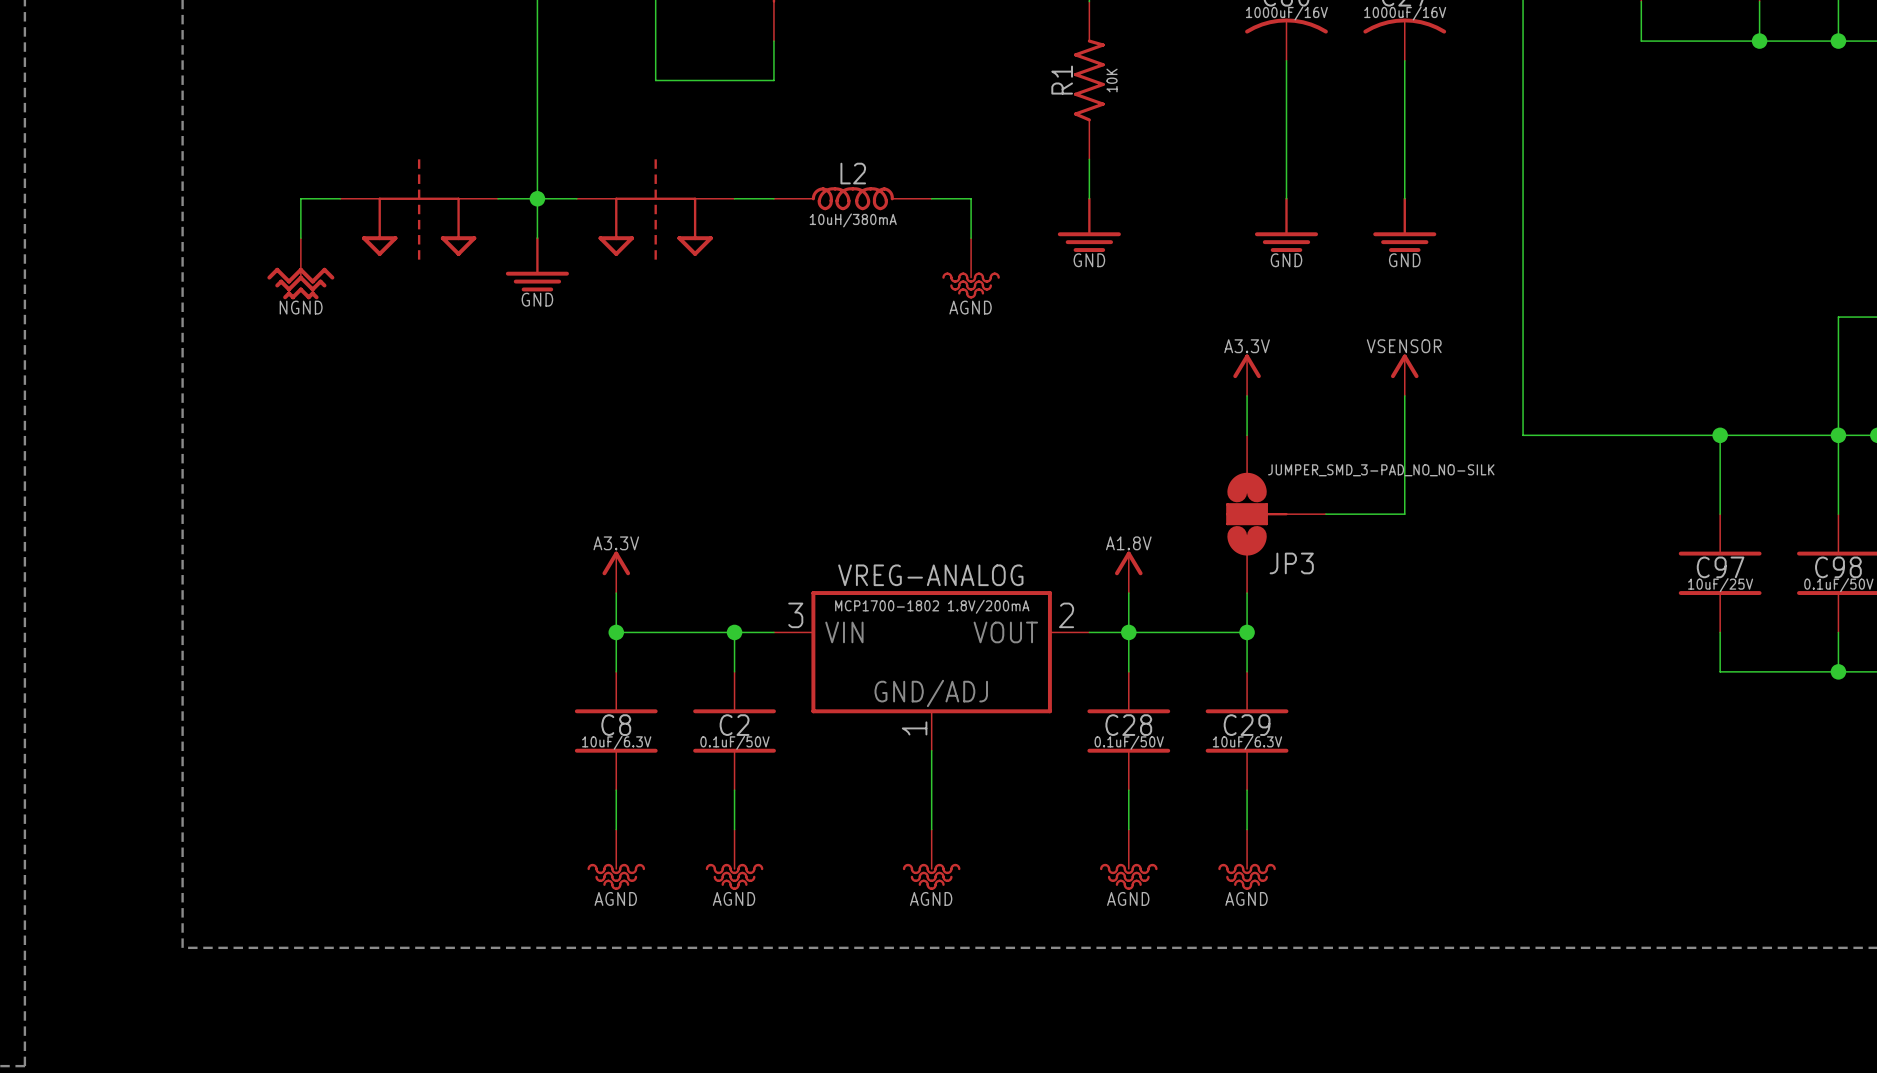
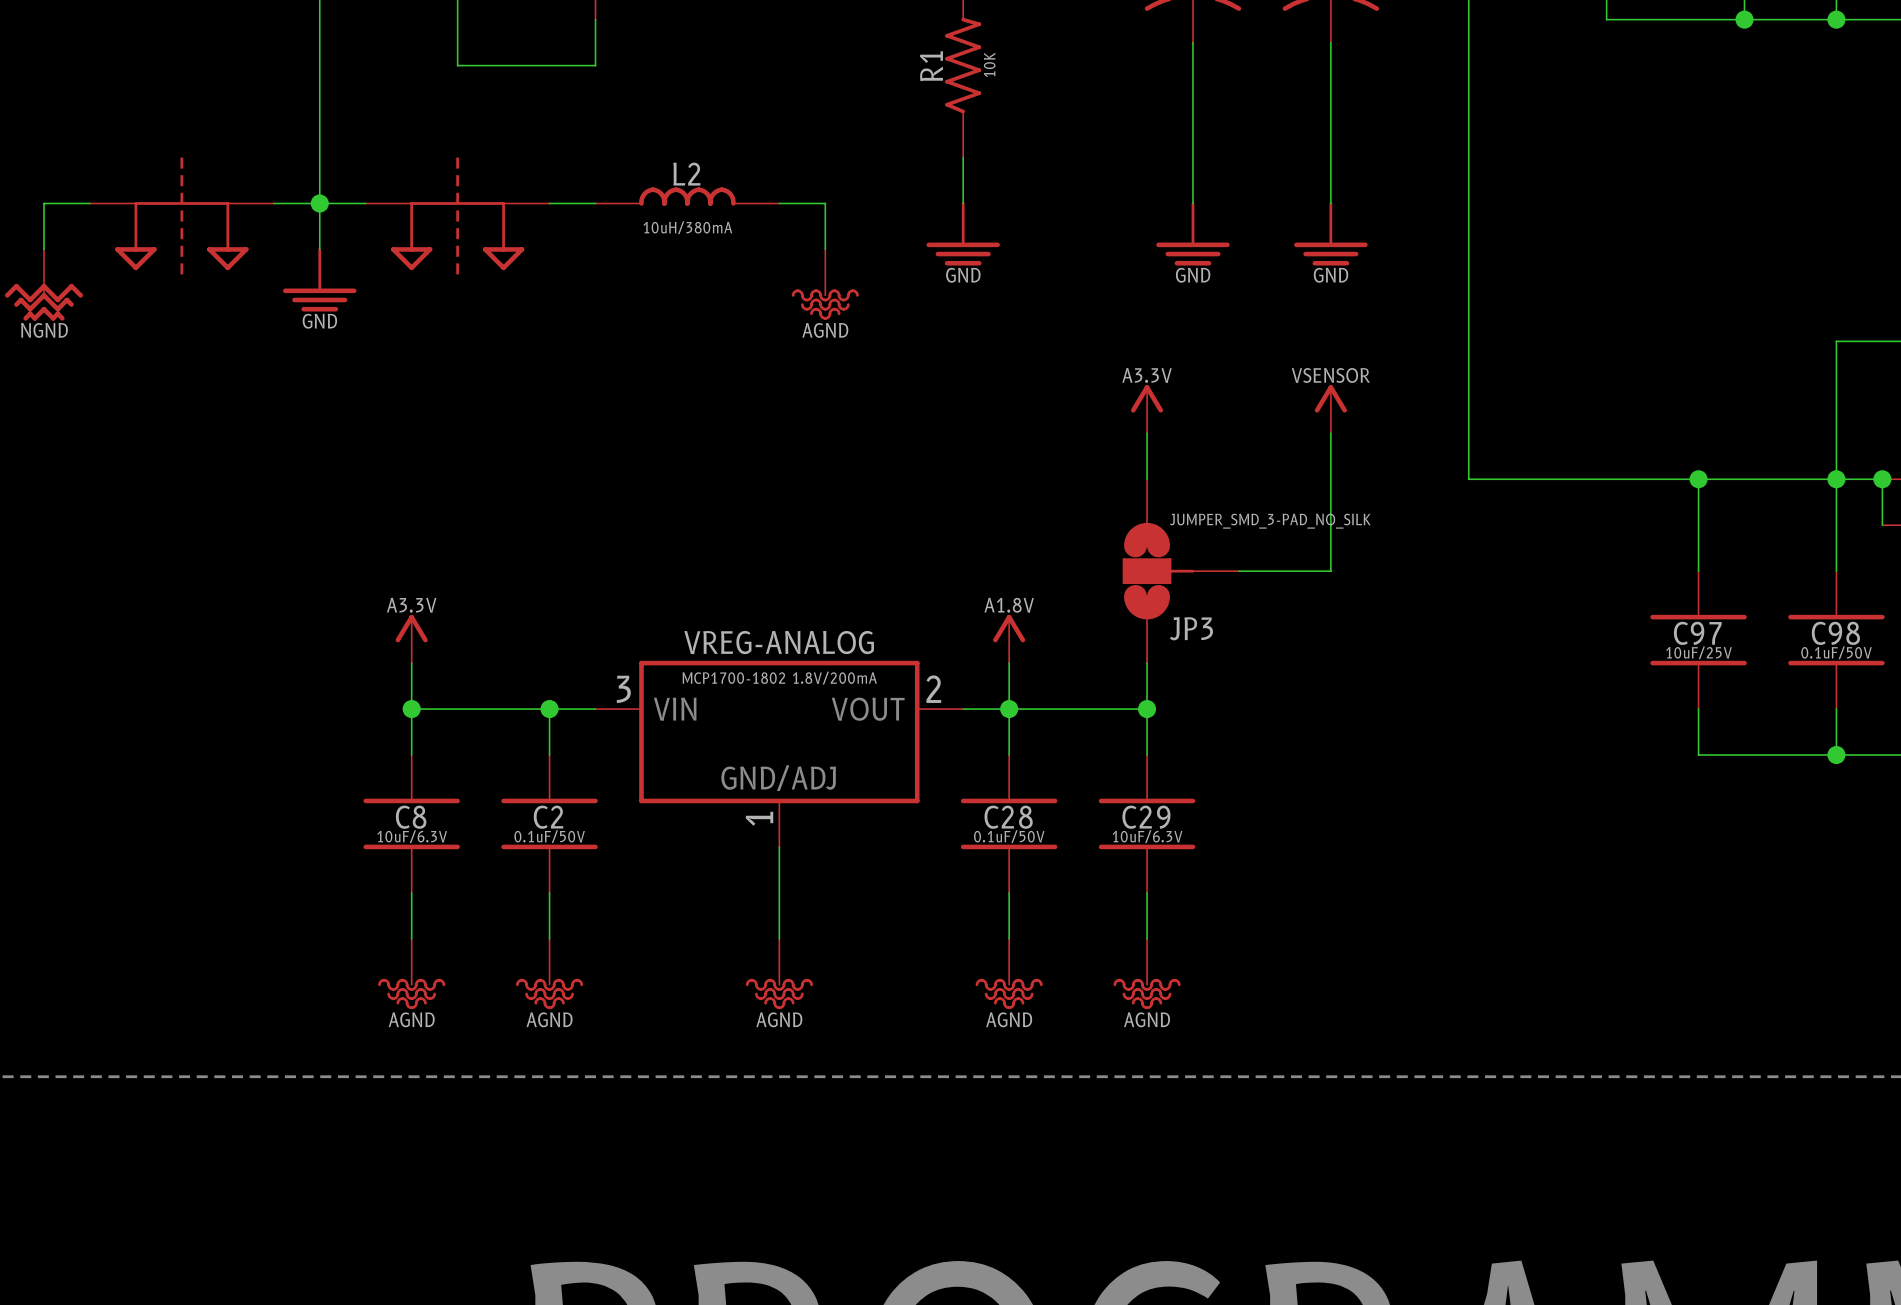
L2 symbol: [773, 187, 932, 211] -> [595, 187, 780, 206]
JP3 value: JUMPER_SMD_3-PAD_NO_NO-SILK (1381, 470) -> JUMPER_SMD_3-PAD_NO_SILK (1270, 521)

